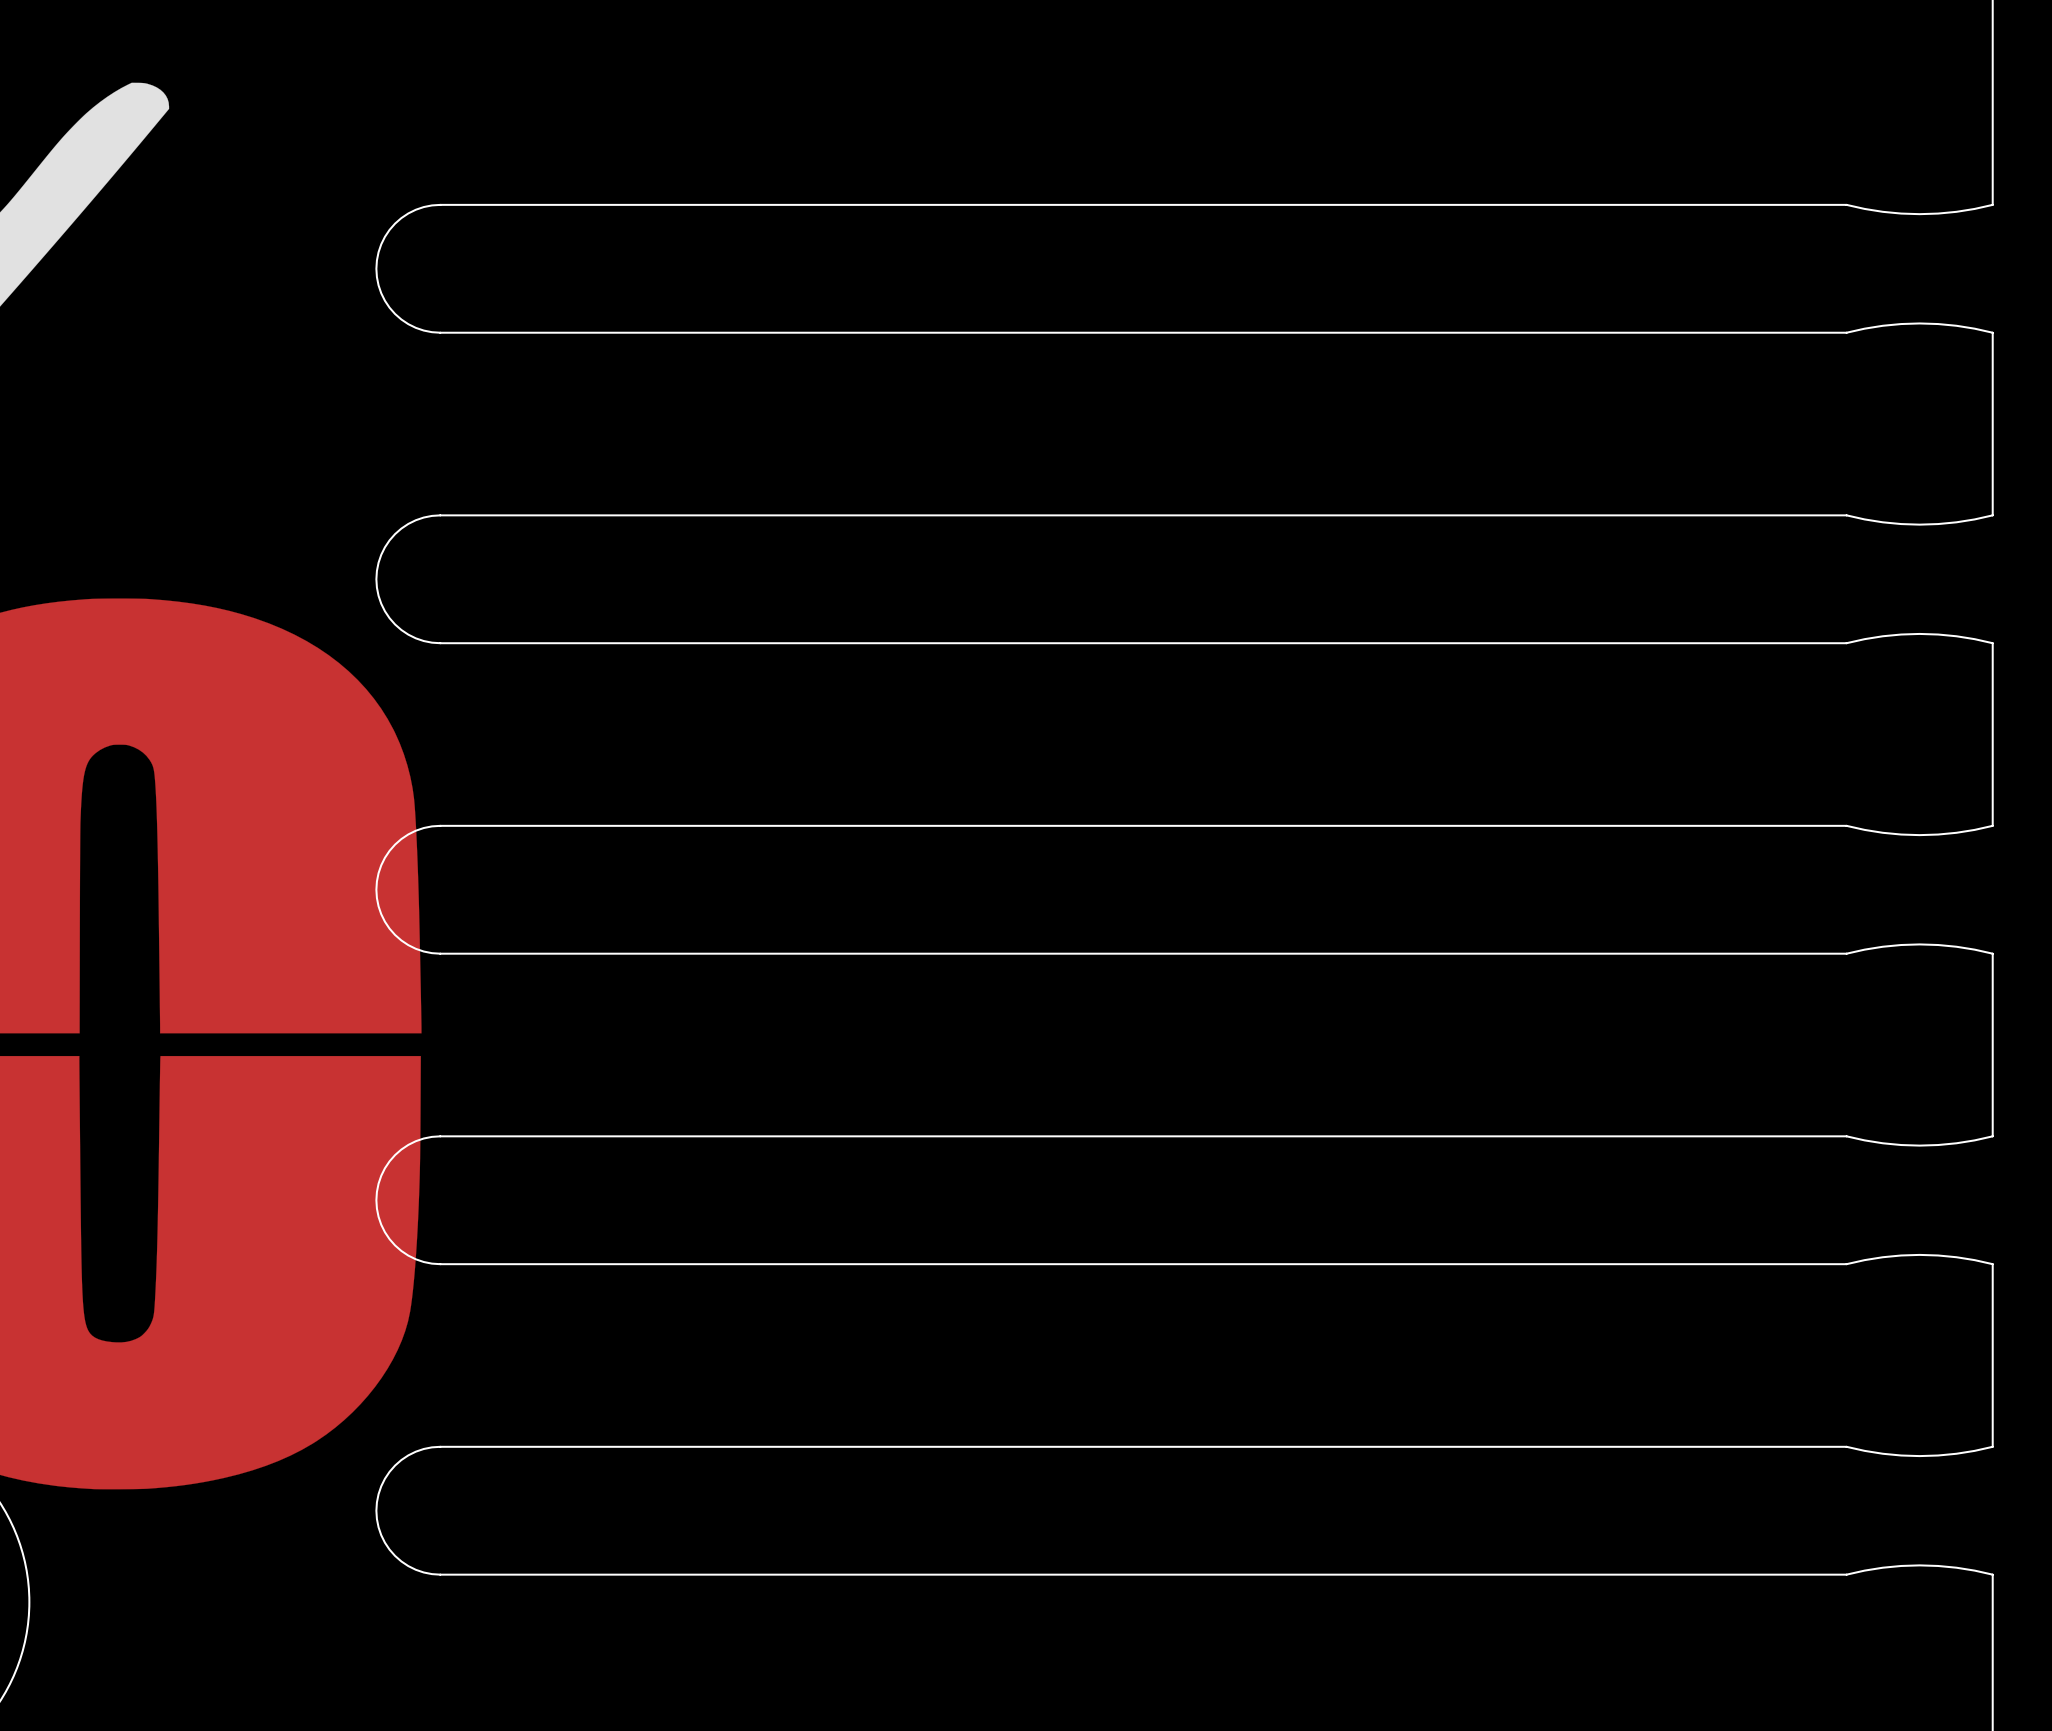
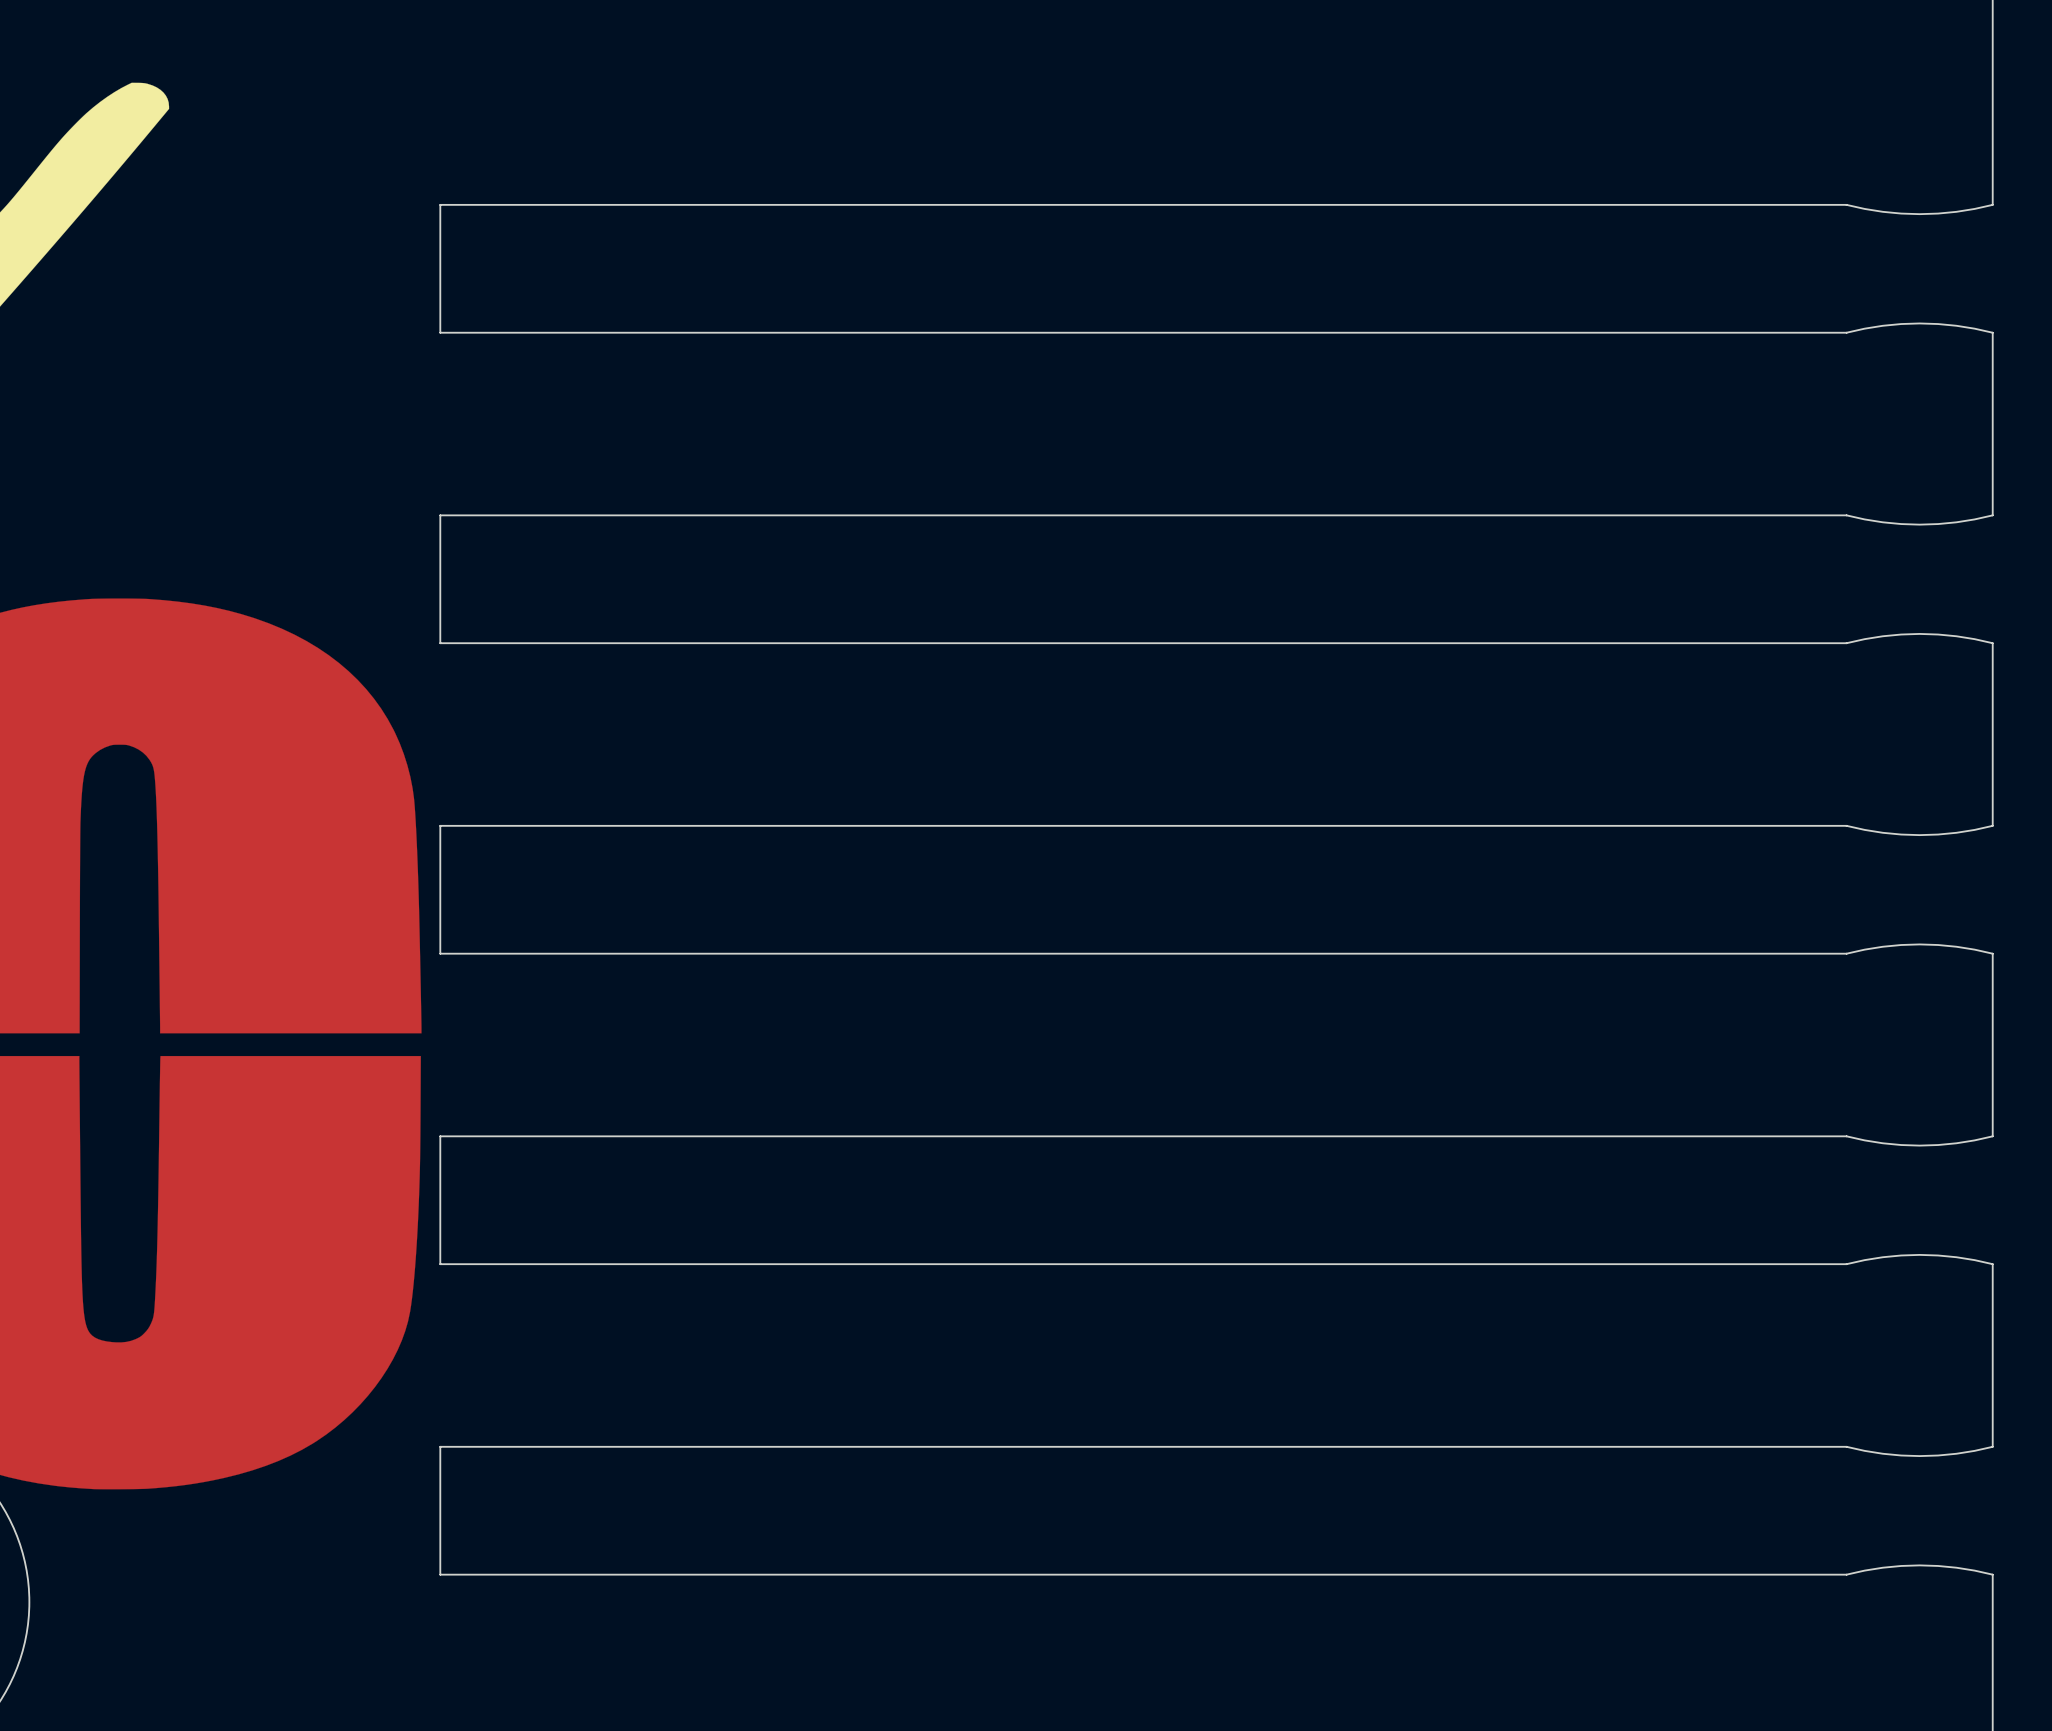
board edge: (440, 204) (415, 209) (395, 223) (381, 244) (376, 268) (381, 293) (395, 314) (415, 327) (440, 332) -> (440, 204) (440, 332)
board edge: (440, 515) (415, 520) (395, 534) (381, 554) (376, 579) (381, 603) (395, 624) (415, 638) (440, 643) -> (440, 515) (440, 643)
board edge: (440, 825) (415, 830) (395, 844) (381, 865) (376, 889) (381, 914) (395, 934) (415, 948) (440, 953) -> (440, 825) (440, 953)
board edge: (440, 1136) (415, 1141) (395, 1155) (381, 1175) (376, 1200) (381, 1224) (395, 1245) (415, 1259) (440, 1264) -> (440, 1136) (440, 1264)
board edge: (440, 1446) (415, 1451) (395, 1465) (381, 1486) (376, 1510) (381, 1535) (395, 1555) (415, 1569) (440, 1574) -> (440, 1446) (440, 1574)

